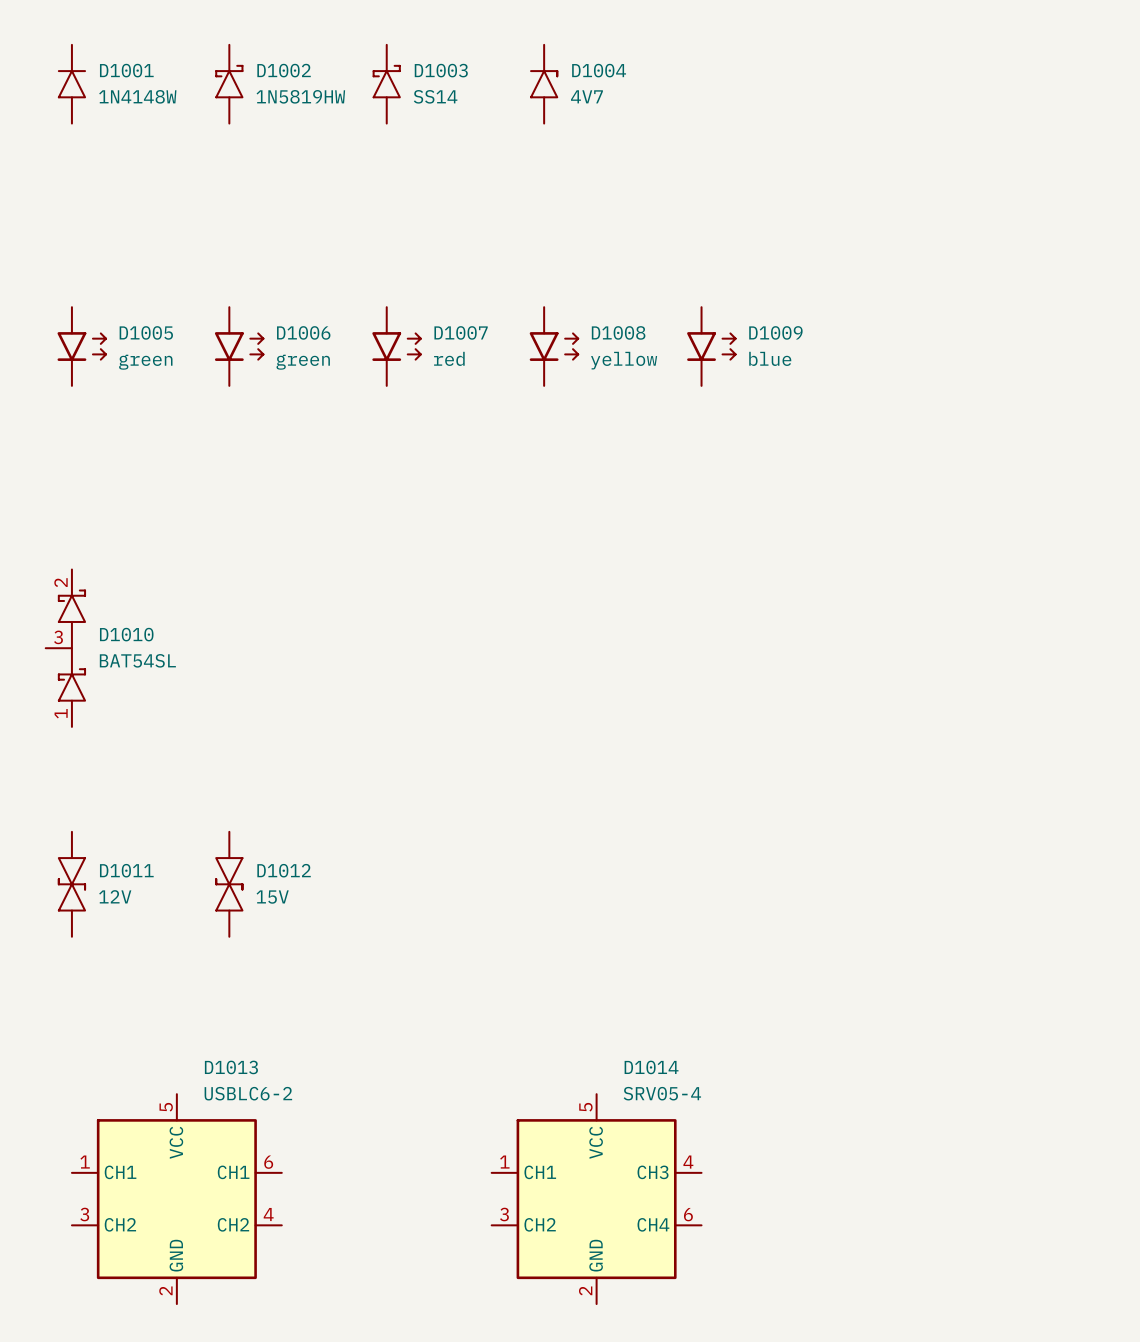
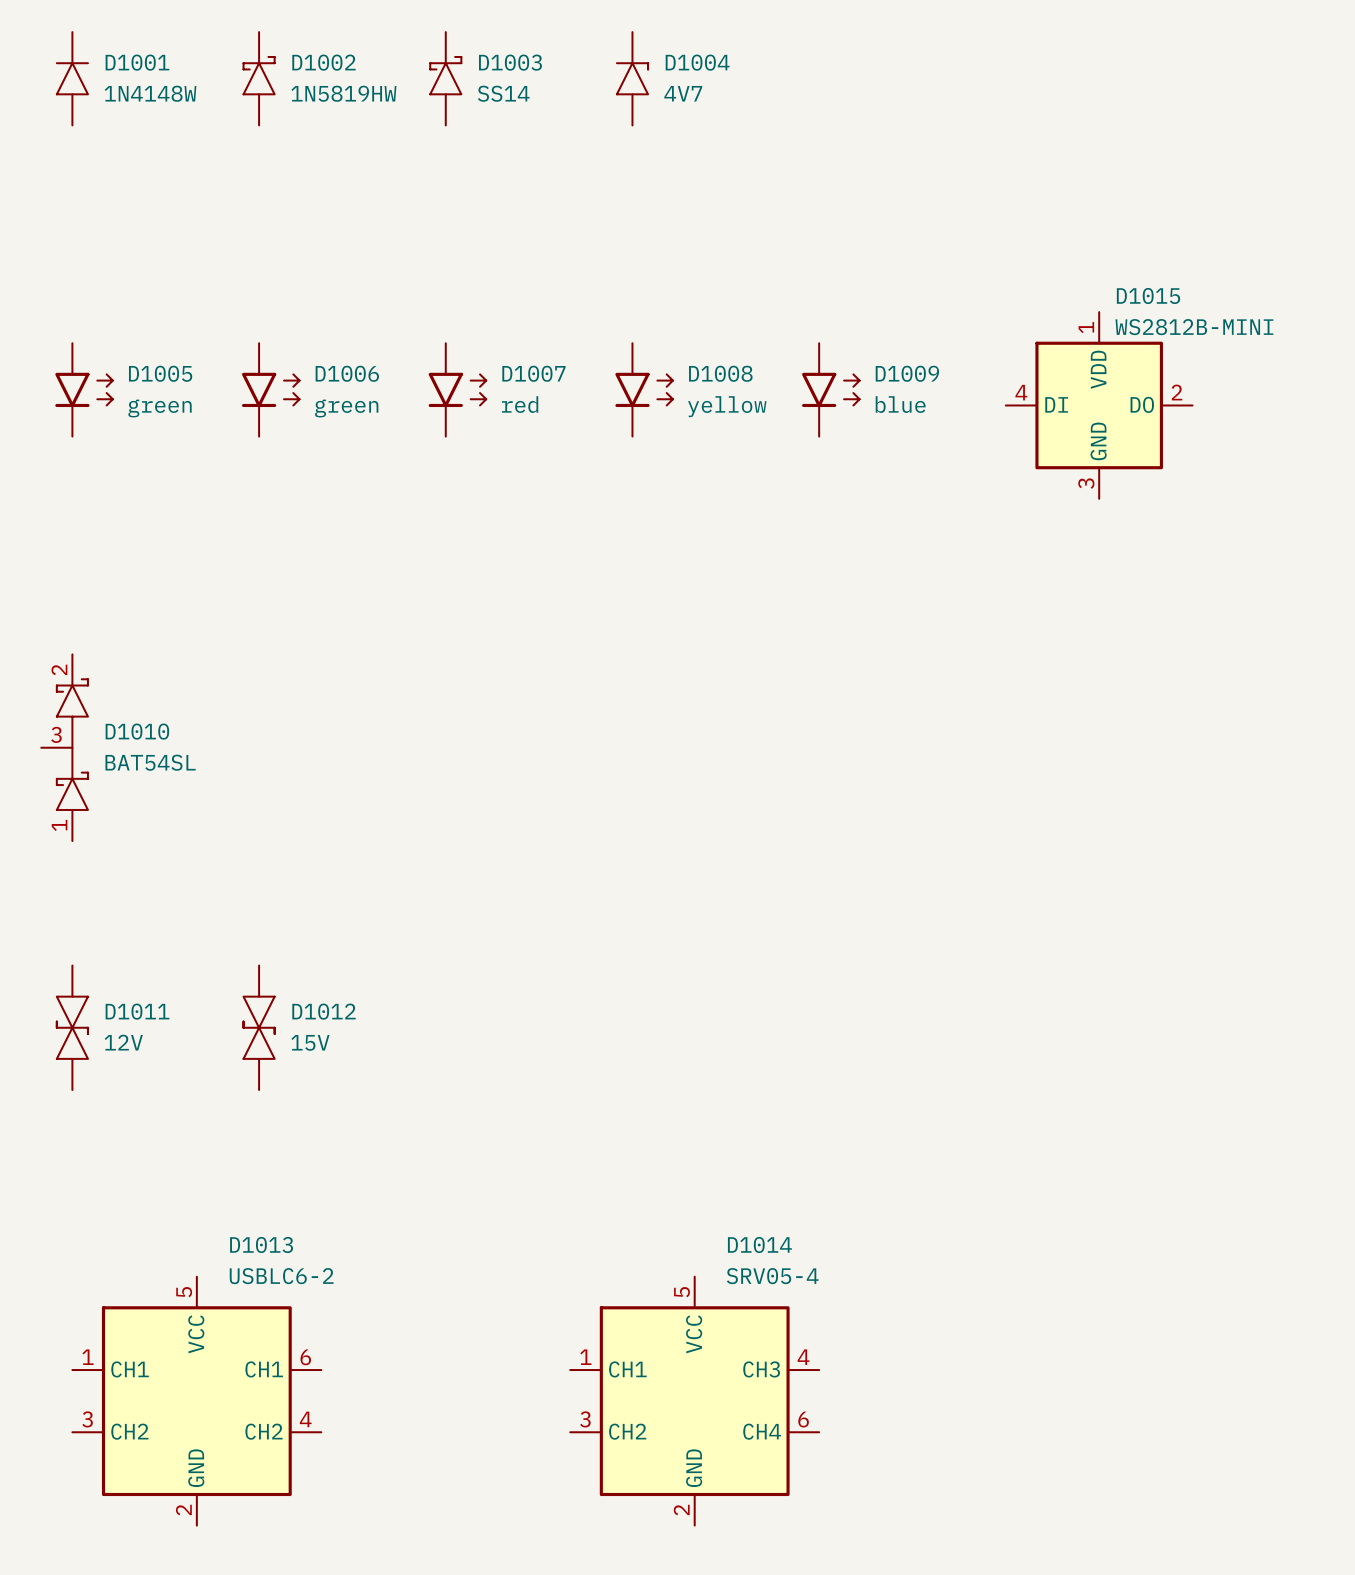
D1015: none -> WS2812B-MINI (1099, 405)

